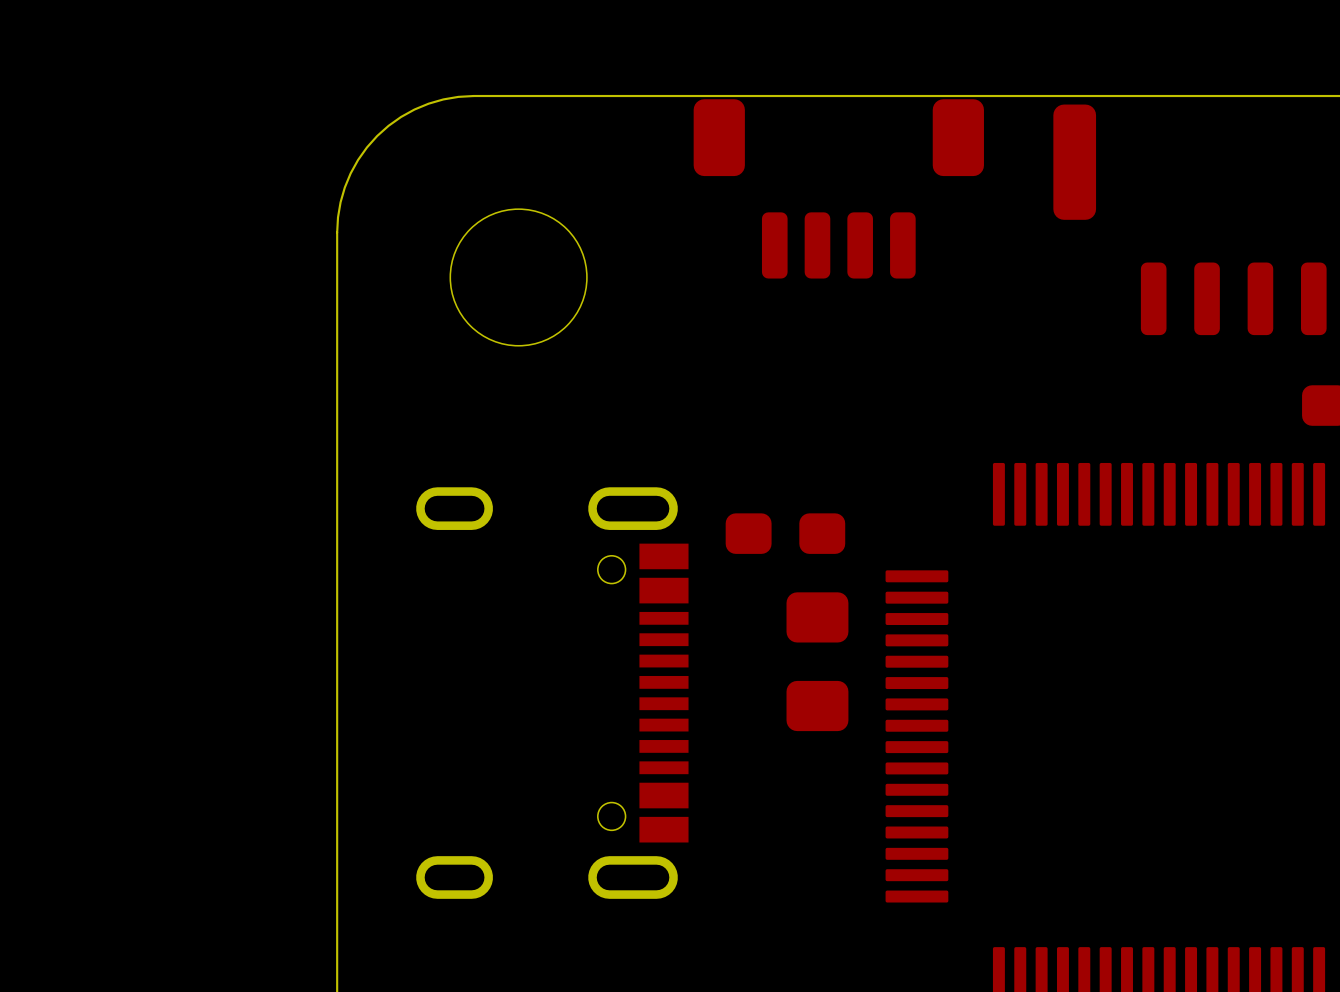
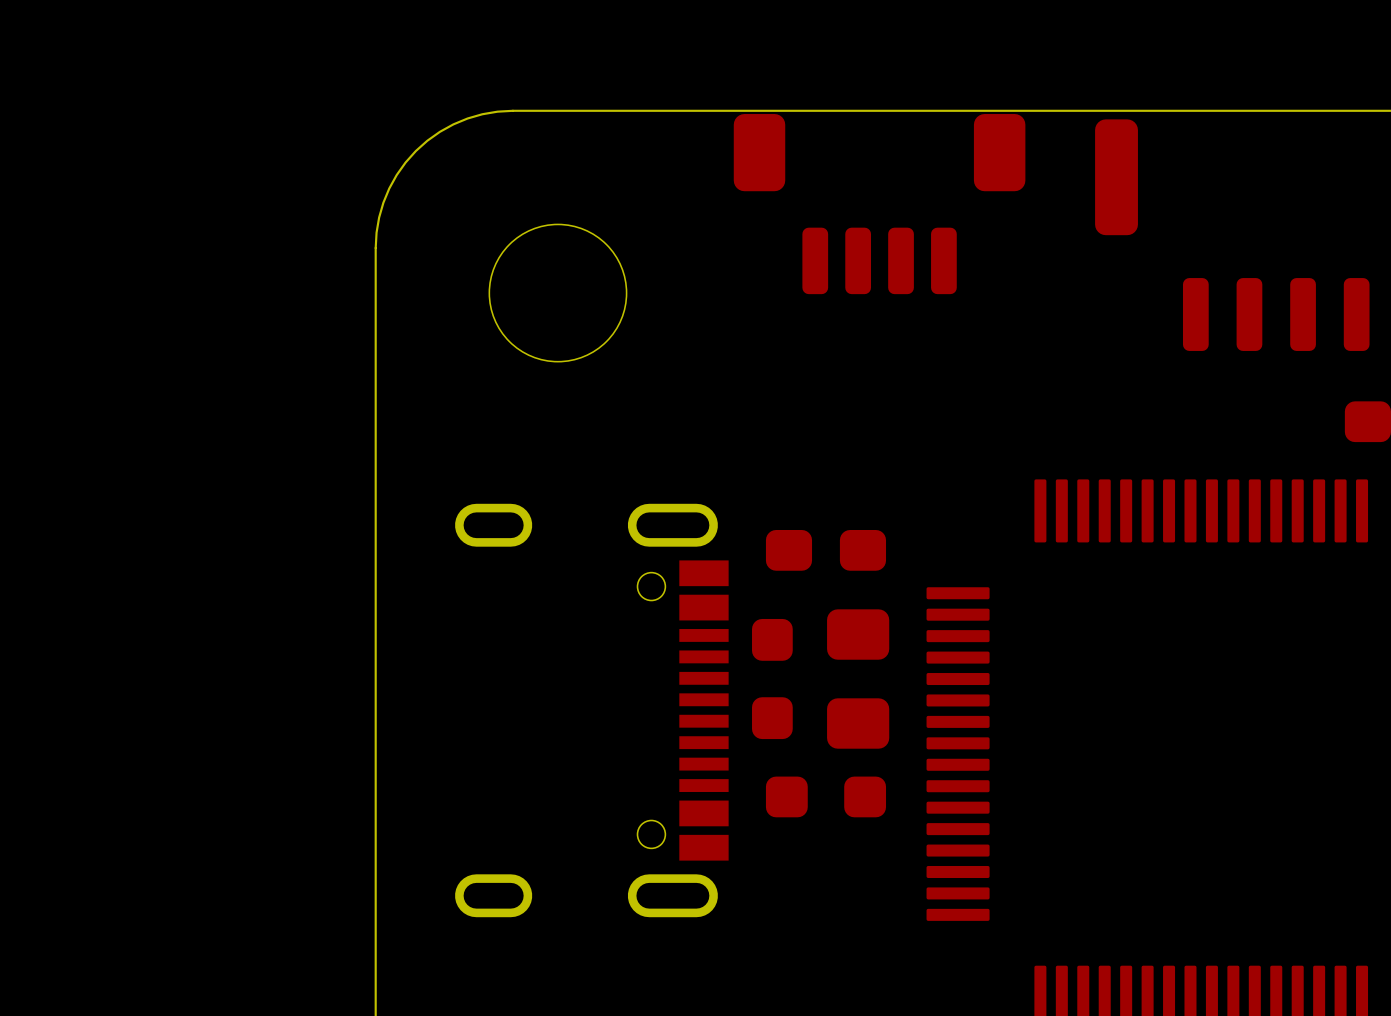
part: none -> (772, 679)
part: none -> (825, 796)

